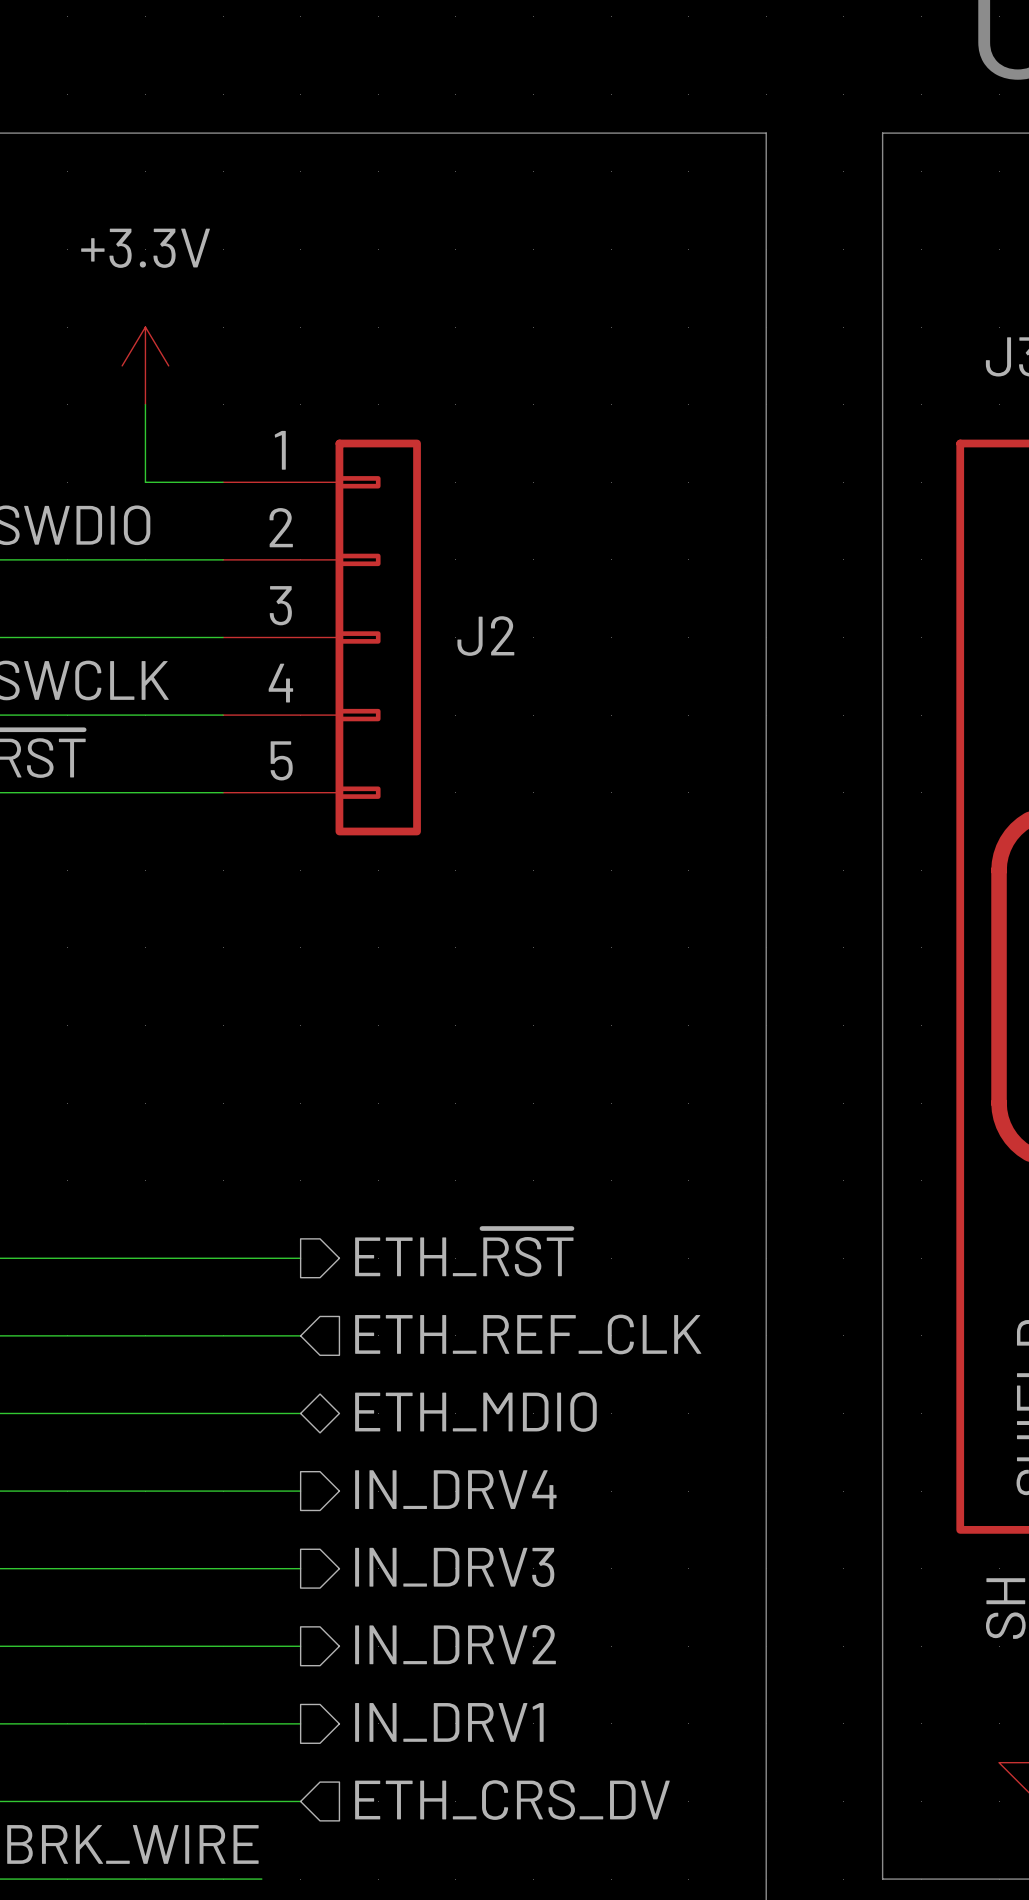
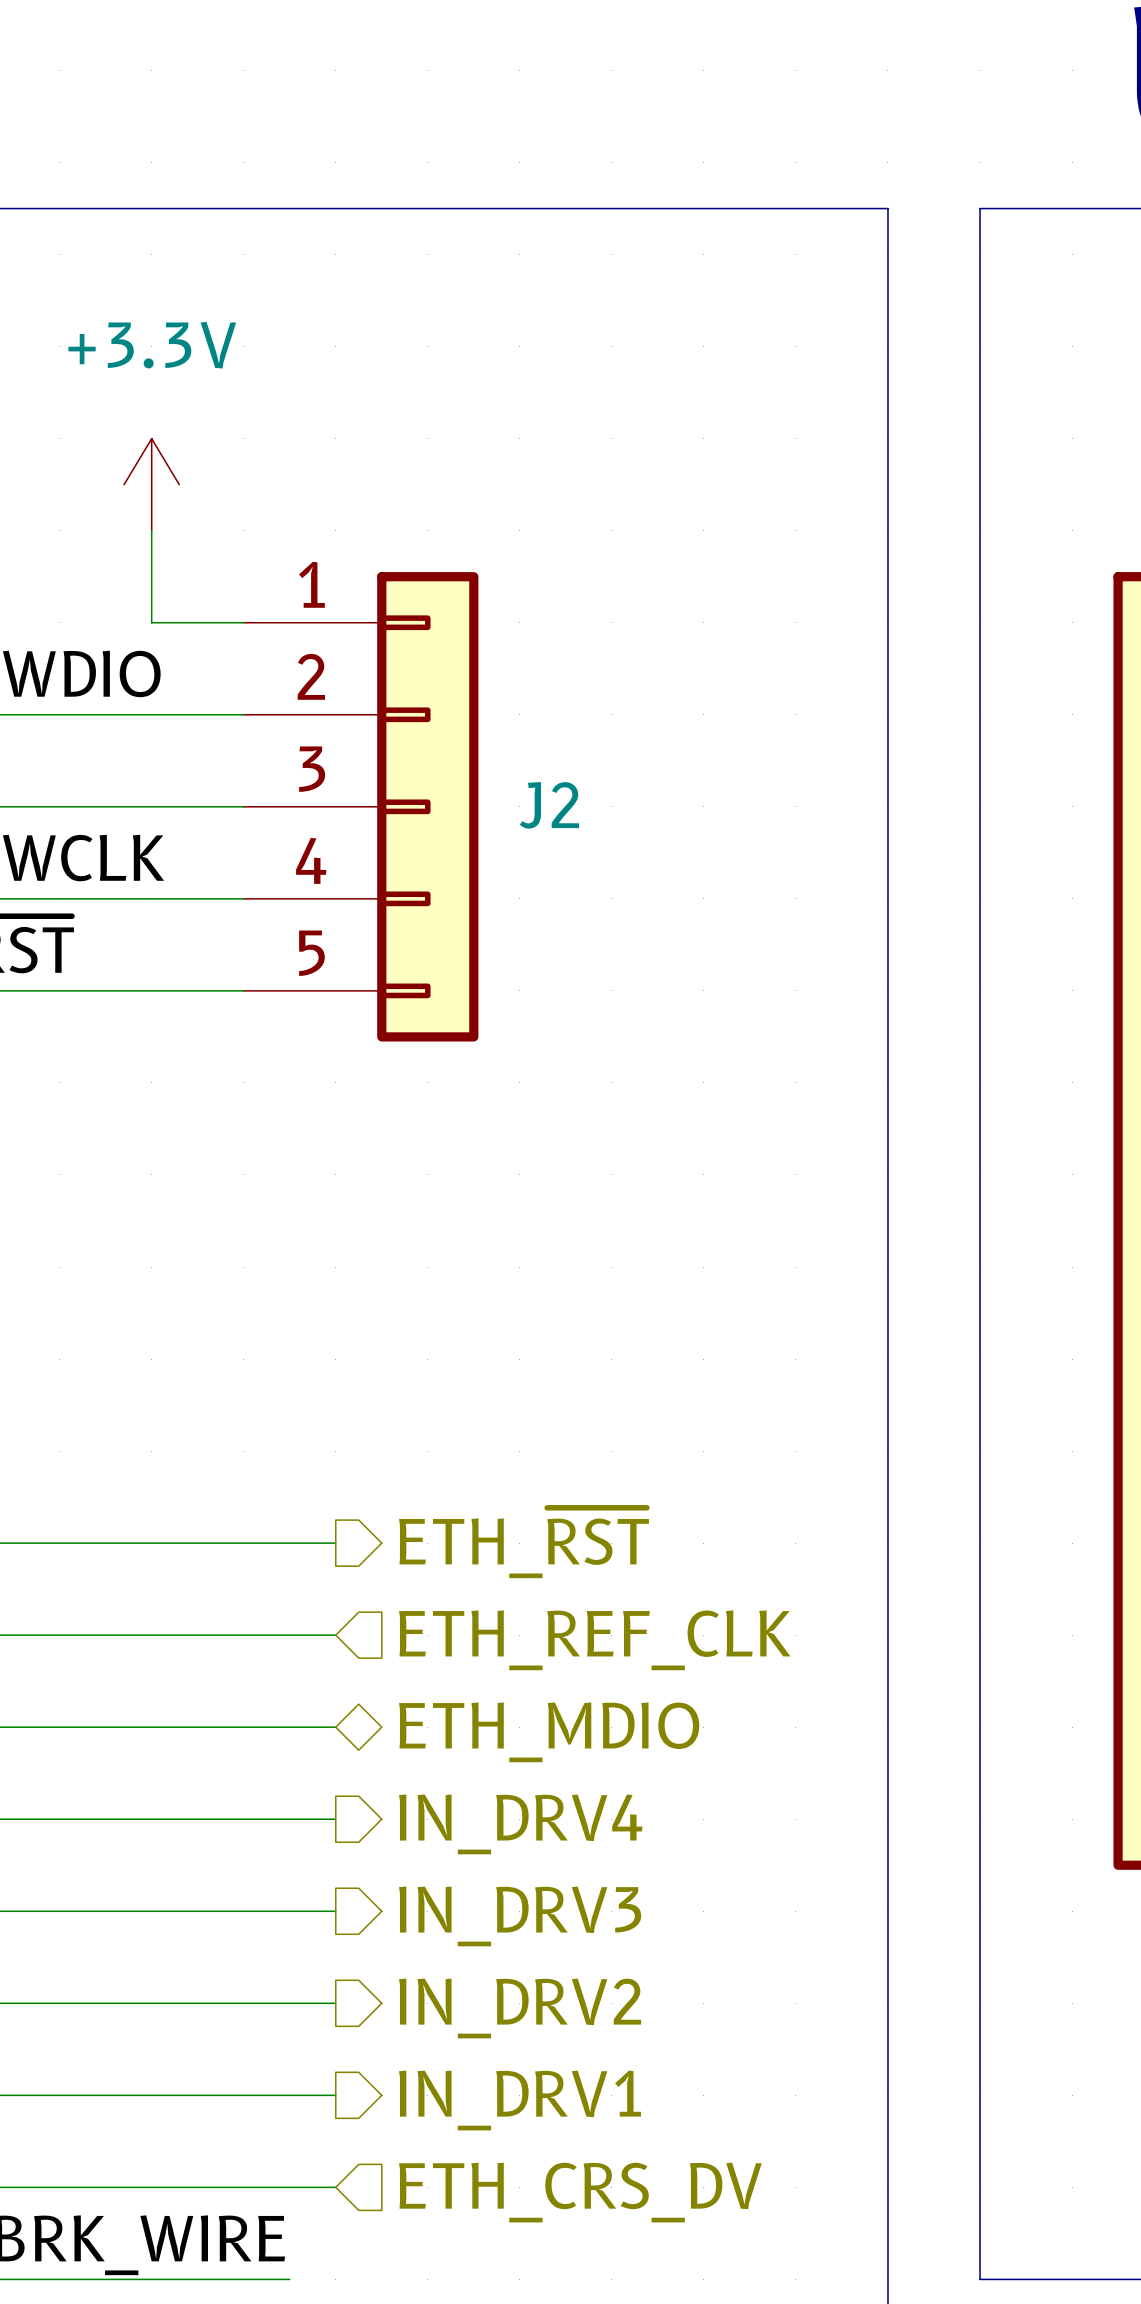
line: (882, 133) (882, 1879) -> (1026, 208) (980, 208) (980, 2279) (1026, 2279)

